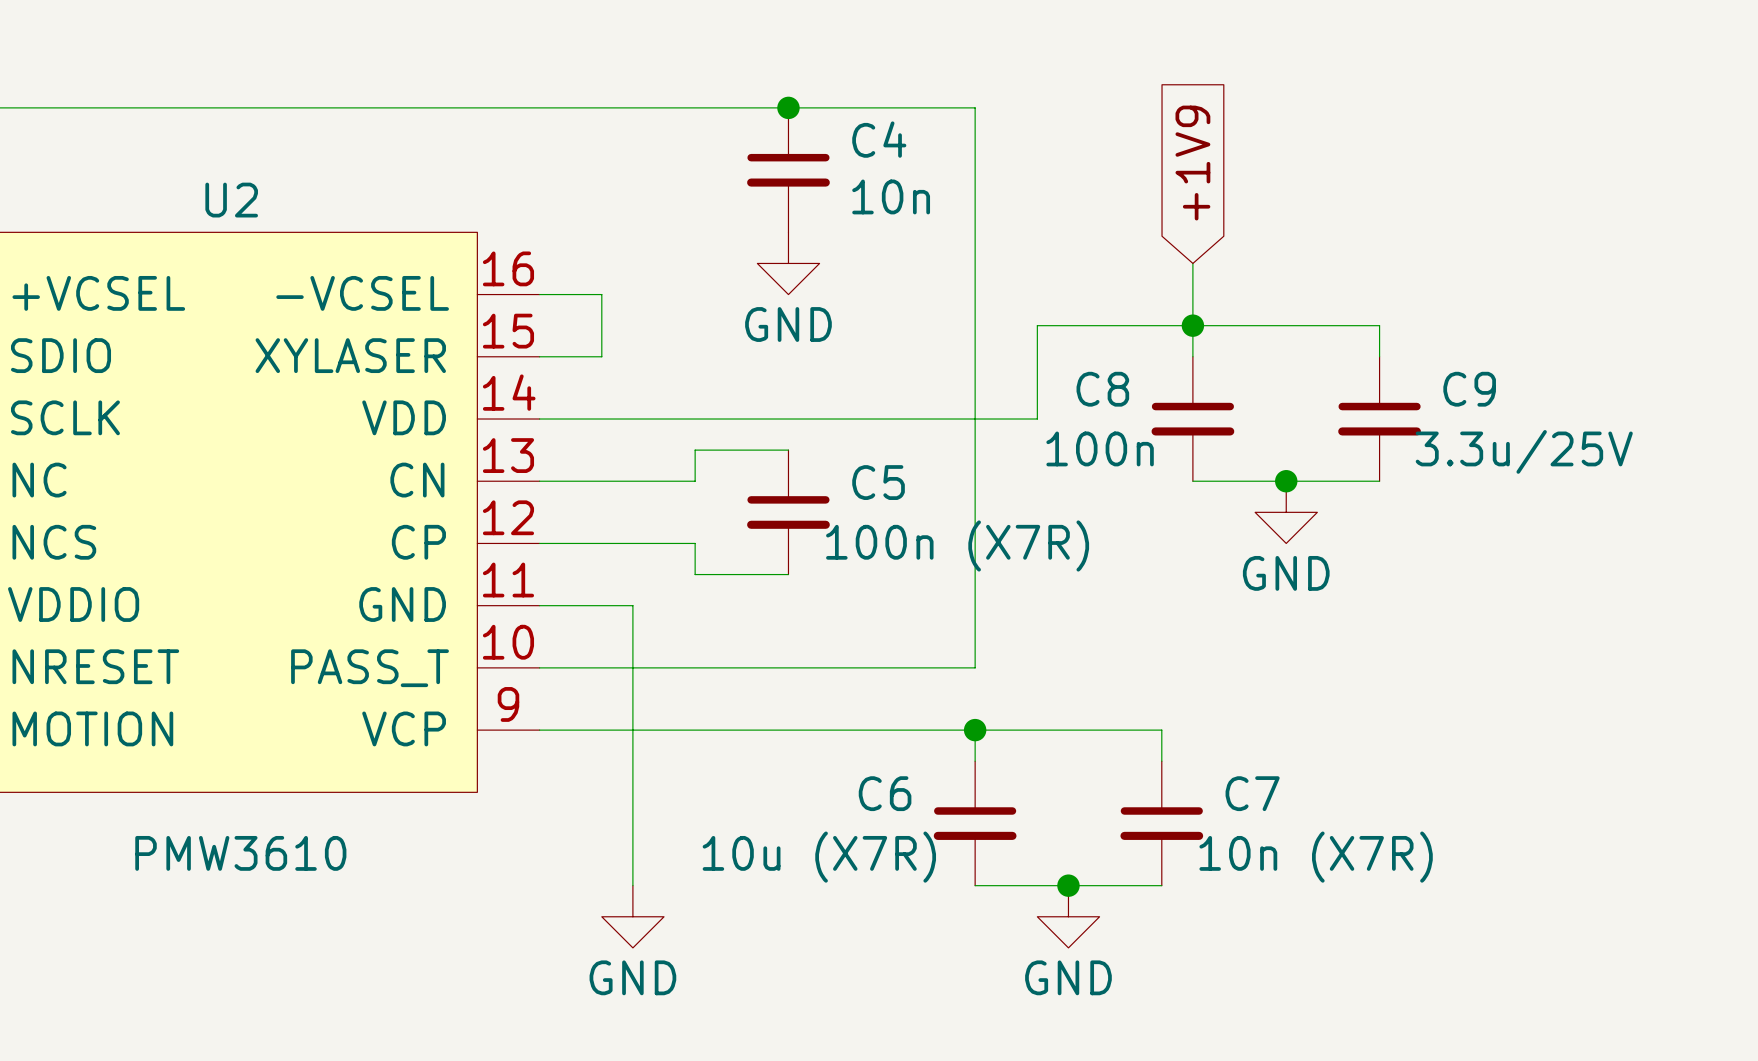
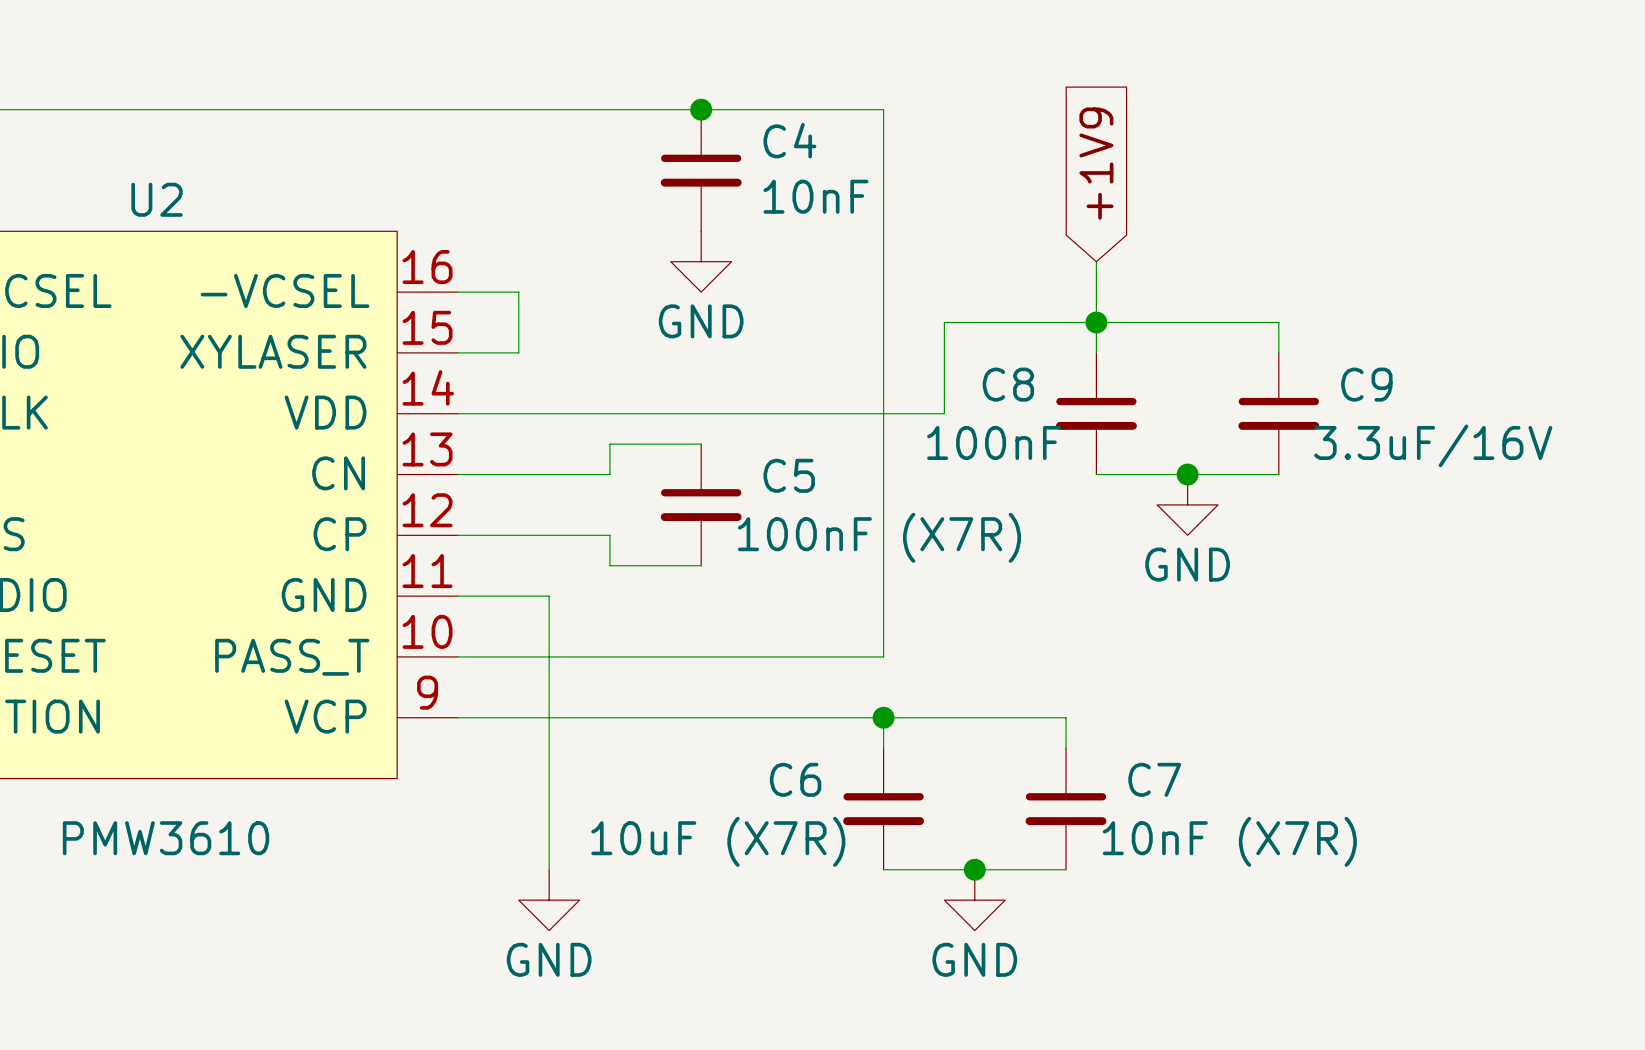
C4 value: 10n (891, 196) -> 10nF (815, 196)
C8 value: 100n (1100, 448) -> 100nF (994, 442)
C9 value: 3.3u/25V (1524, 451) -> 3.3uF/16V (1433, 445)
C5 value: 100n (X7R) (957, 545) -> 100nF (X7R) (879, 537)
C6 value: 10u (X7R) (819, 857) -> 10uF (X7R) (718, 841)
C7 value: 10n (X7R) (1316, 857) -> 10nF (X7R) (1229, 841)

